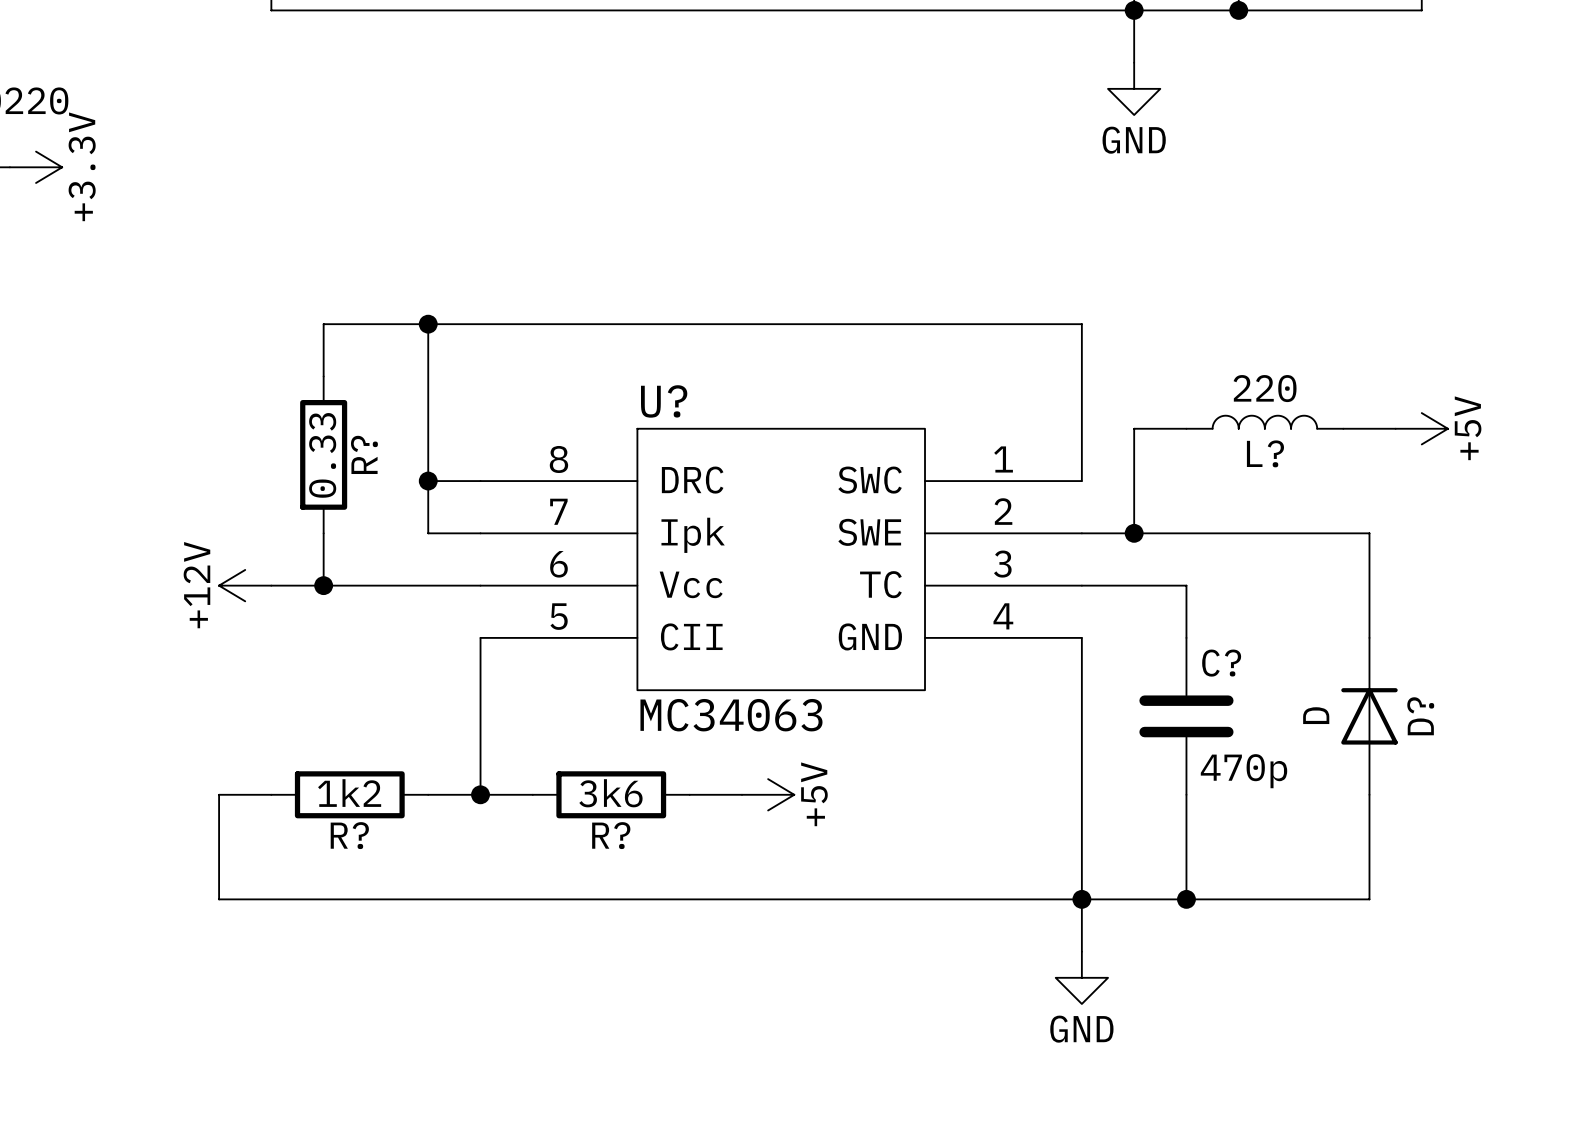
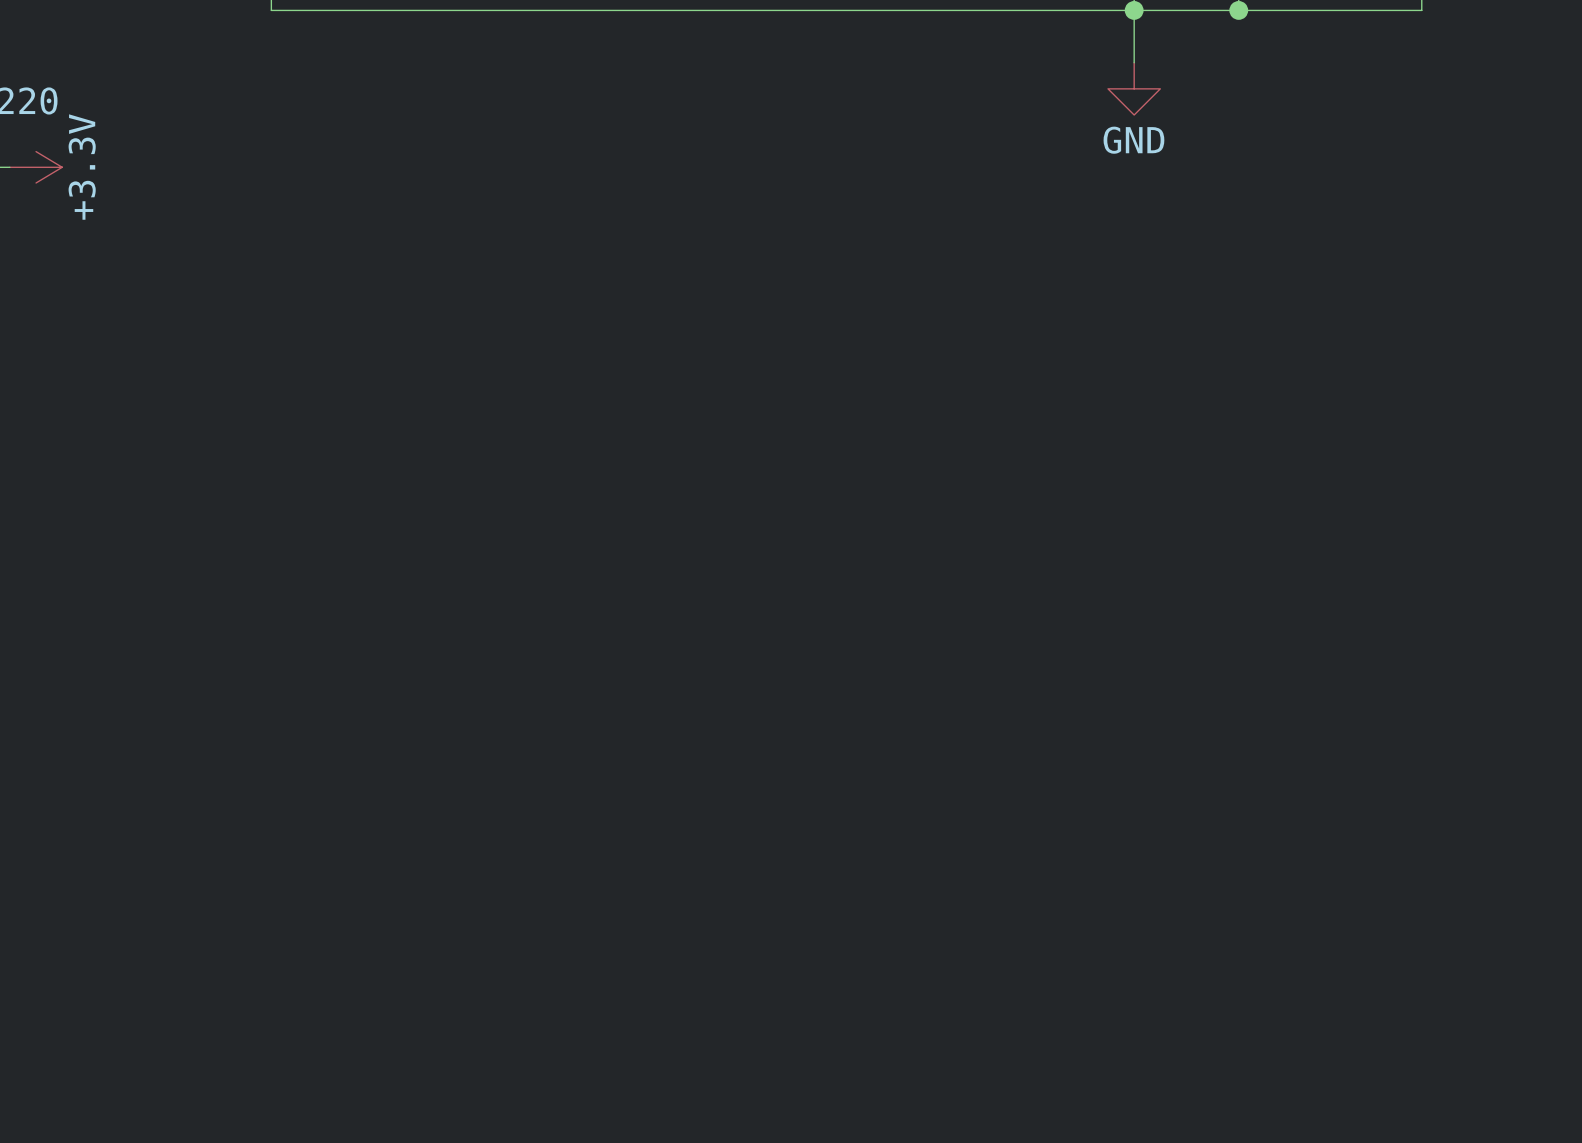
wire: (428, 324) (428, 533) (480, 533) -> none
junction: (428, 324) -> none
wire: (323, 376) (323, 324) (1081, 324) (1081, 481) -> none
L?: 220 (1264, 422) -> none
wire: (1186, 428) (1134, 428) (1134, 533) -> none
wire: (1343, 428) (1395, 428) -> none
power symbol: +5V (1421, 428) -> none
R?: 0.33 (323, 454) -> none
wire: (428, 481) (480, 481) -> none
junction: (428, 481) -> none
wire: (323, 533) (323, 585) -> none
wire: (1081, 533) (1369, 533) (1369, 637) -> none
junction: (1134, 533) -> none
U?: MC34063 (781, 559) -> none
power symbol: +12V (245, 585) -> none
wire: (271, 585) (480, 585) -> none
junction: (323, 585) -> none
wire: (1081, 585) (1186, 585) (1186, 637) -> none
wire: (480, 637) (480, 794) -> none
wire: (1081, 637) (1081, 951) -> none
C?: 470p (1186, 716) -> none
D?: D (1369, 716) -> none
wire: (271, 794) (219, 794) (219, 899) (1369, 899) (1369, 794) -> none
R?: 1k2 (349, 794) -> none
wire: (428, 794) (532, 794) -> none
junction: (480, 794) -> none
R?: 3k6 (611, 794) -> none
wire: (689, 794) (741, 794) -> none
power symbol: +5V (768, 794) -> none
wire: (1186, 794) (1186, 899) -> none
junction: (1081, 899) -> none
junction: (1186, 899) -> none
power symbol: GND (1081, 977) -> none

